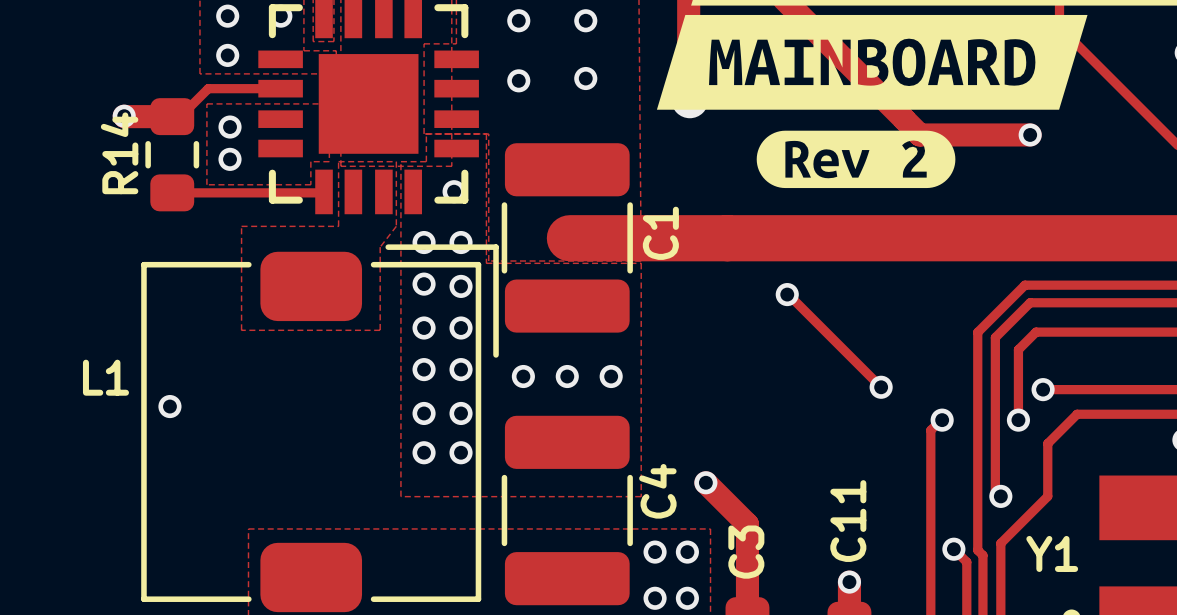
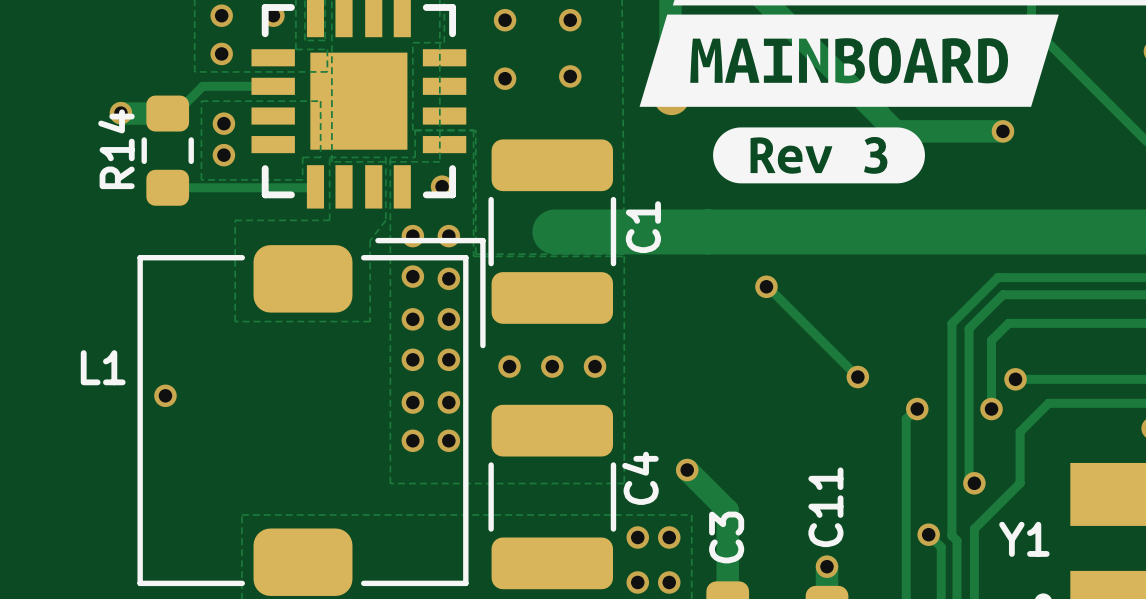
drawing shape: [756, 130, 956, 189] -> [713, 127, 925, 184]

